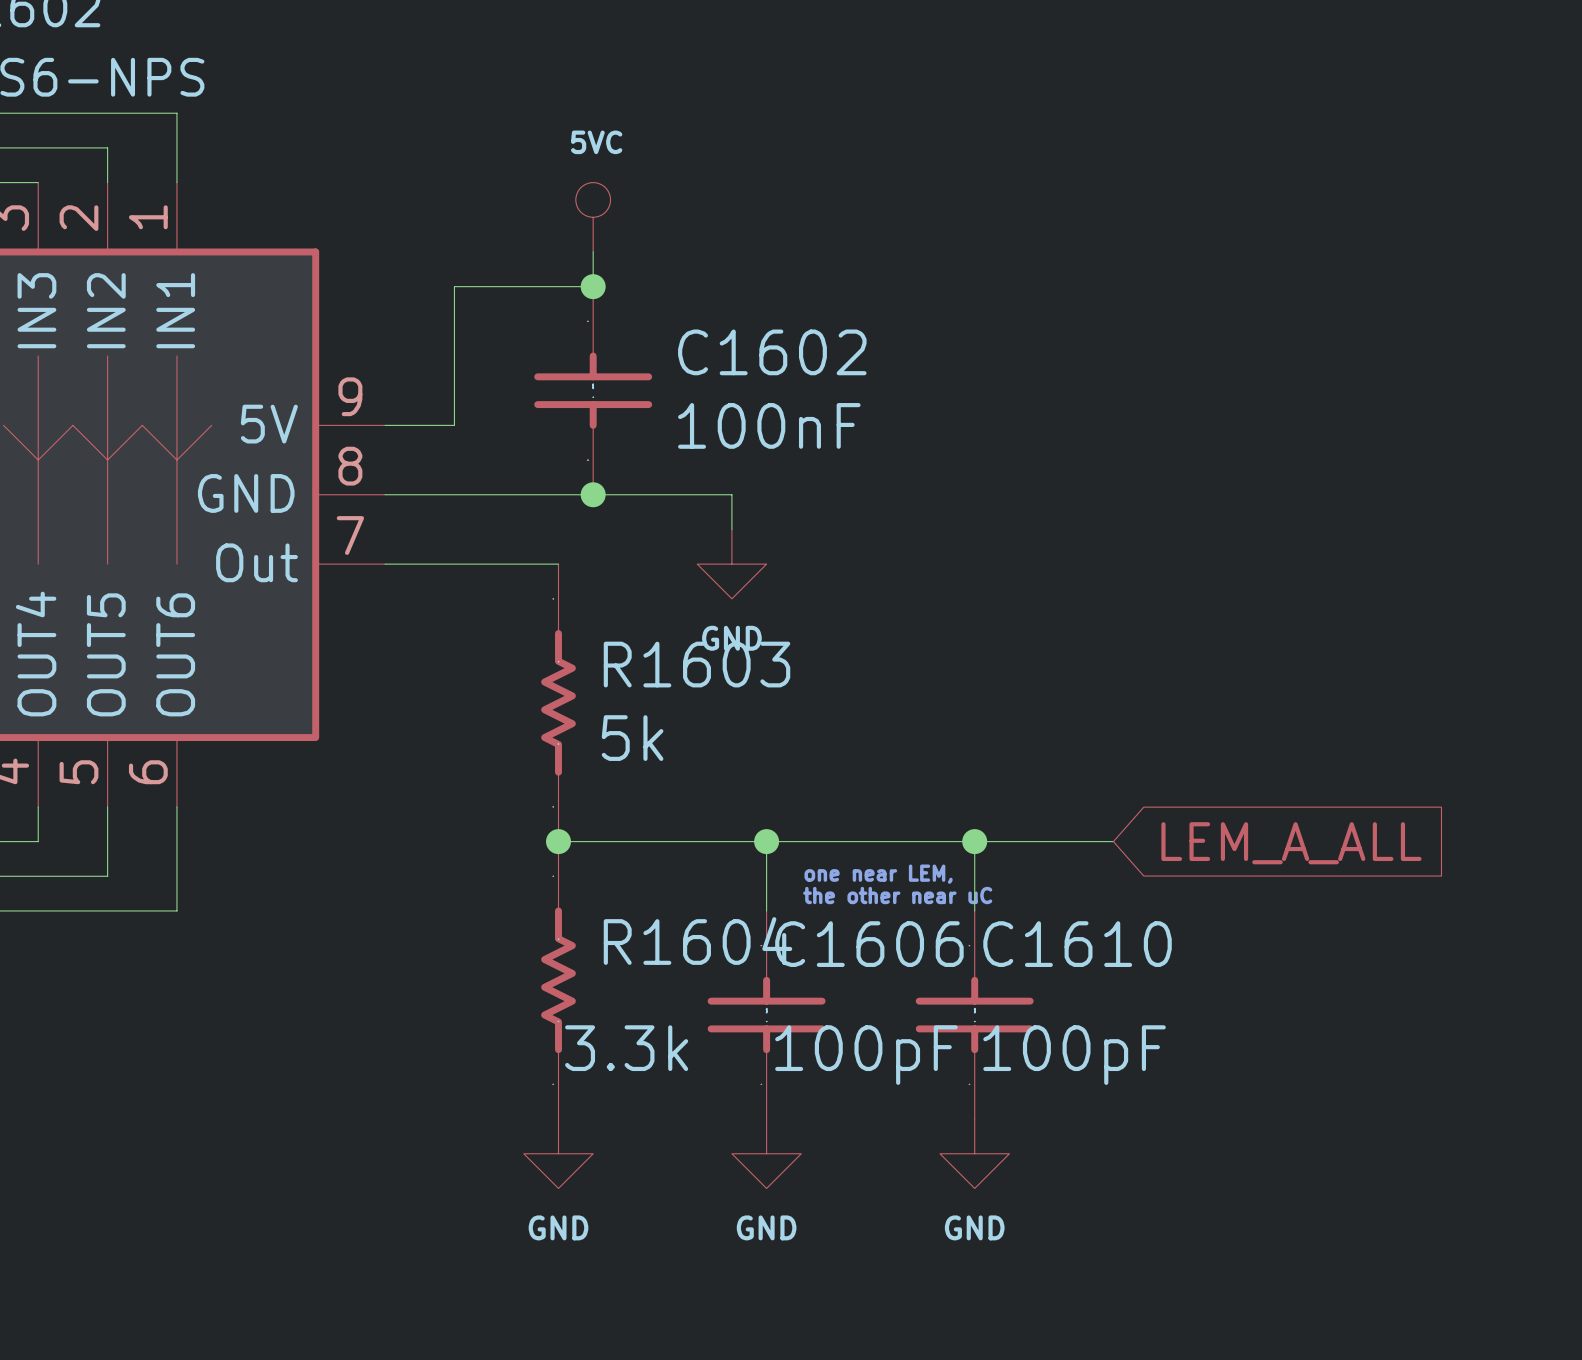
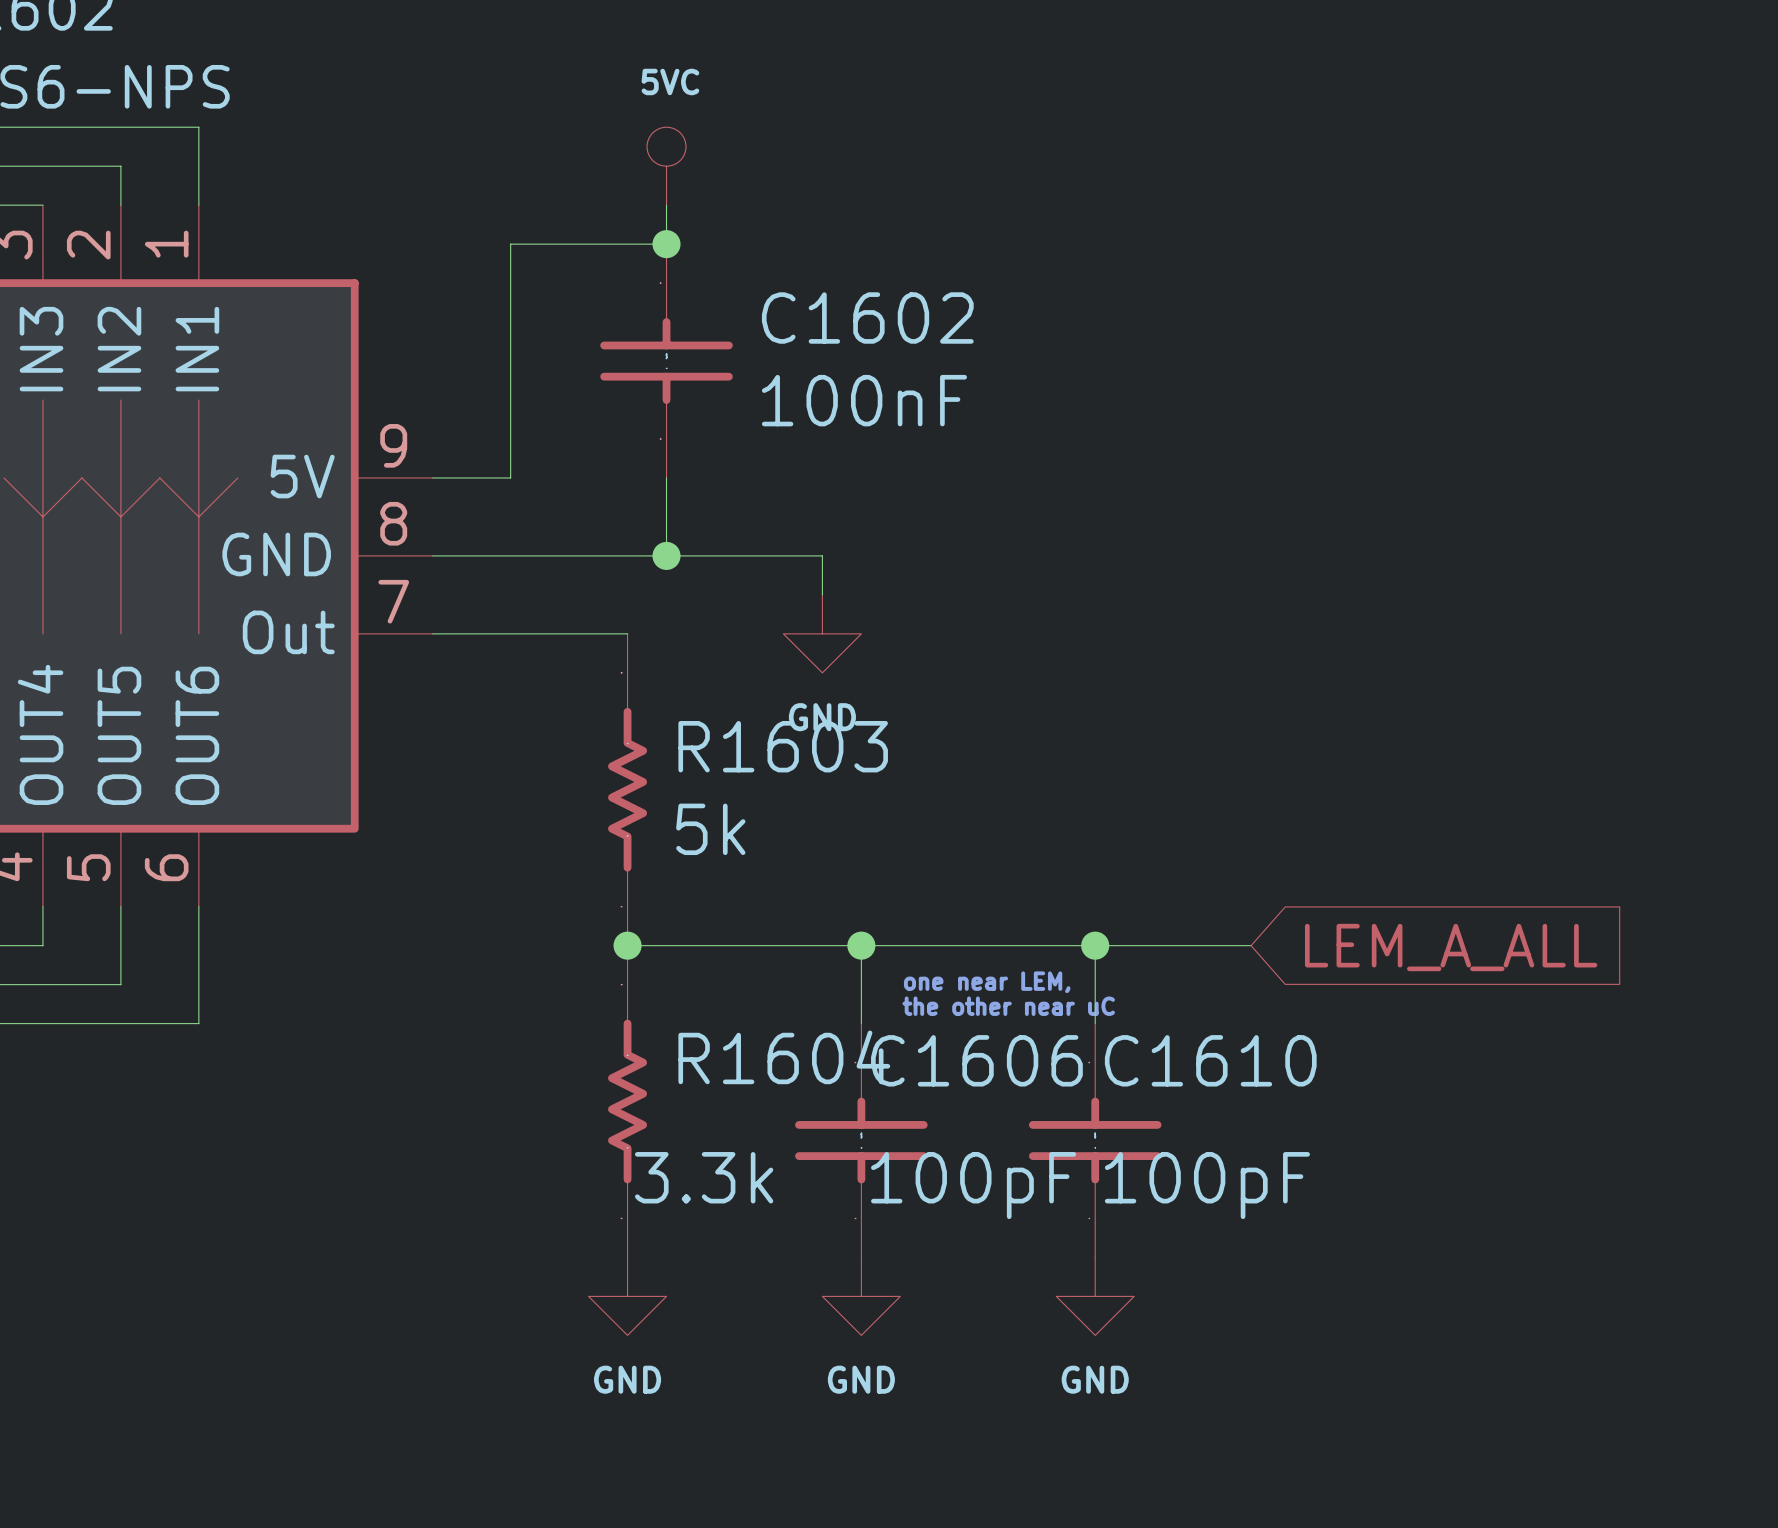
power symbol position: 5VC (593, 217) -> 5VC (666, 166)
wire: (593, 251) (593, 286) (454, 286) -> (666, 205) (666, 244) (510, 244) (510, 322)
junction position: (593, 286) -> (666, 244)
C1602 position: (593, 390) -> (666, 361)

